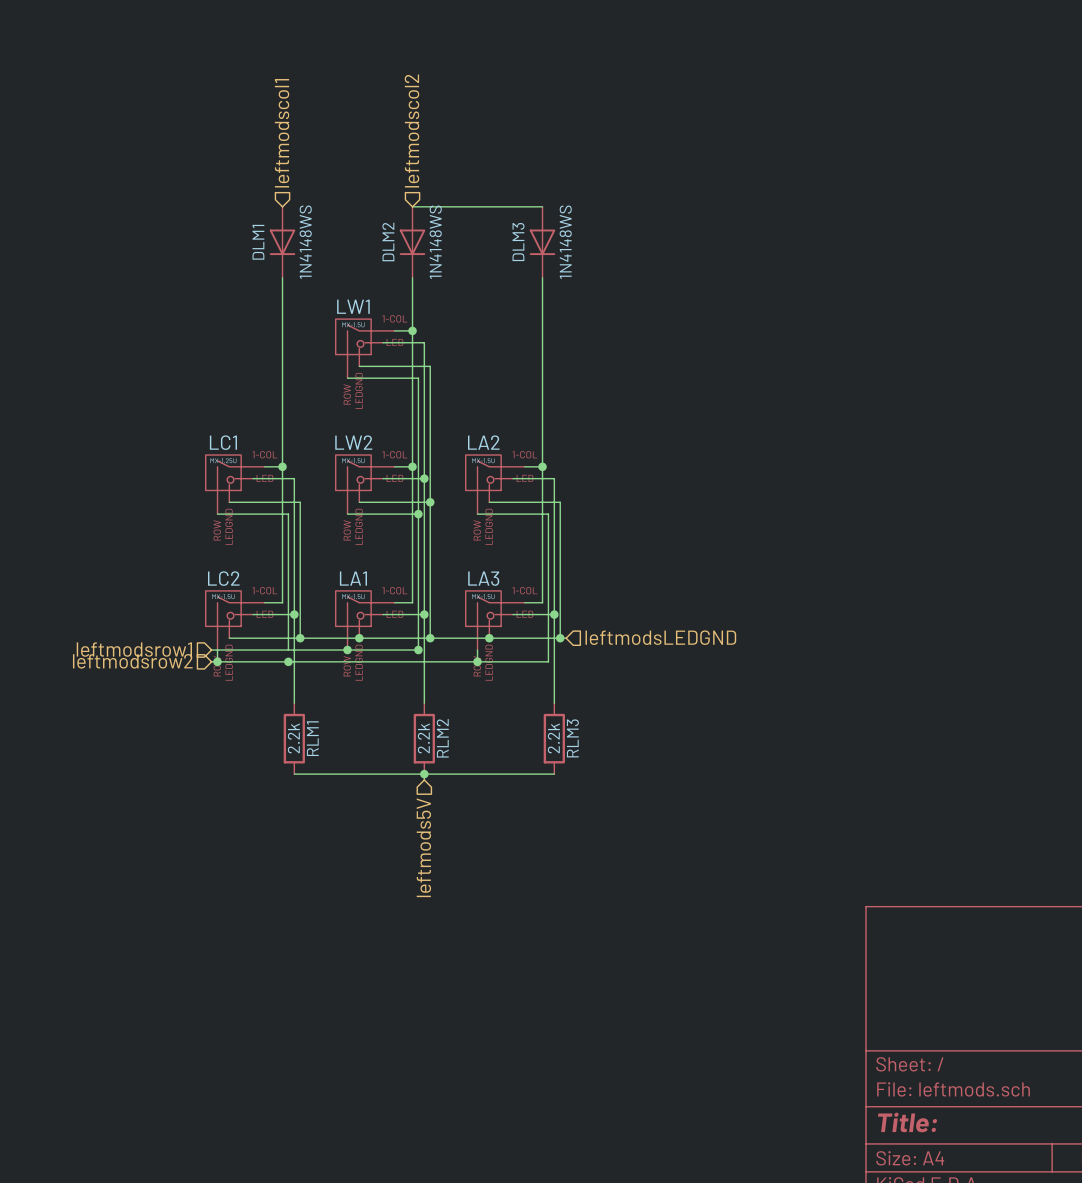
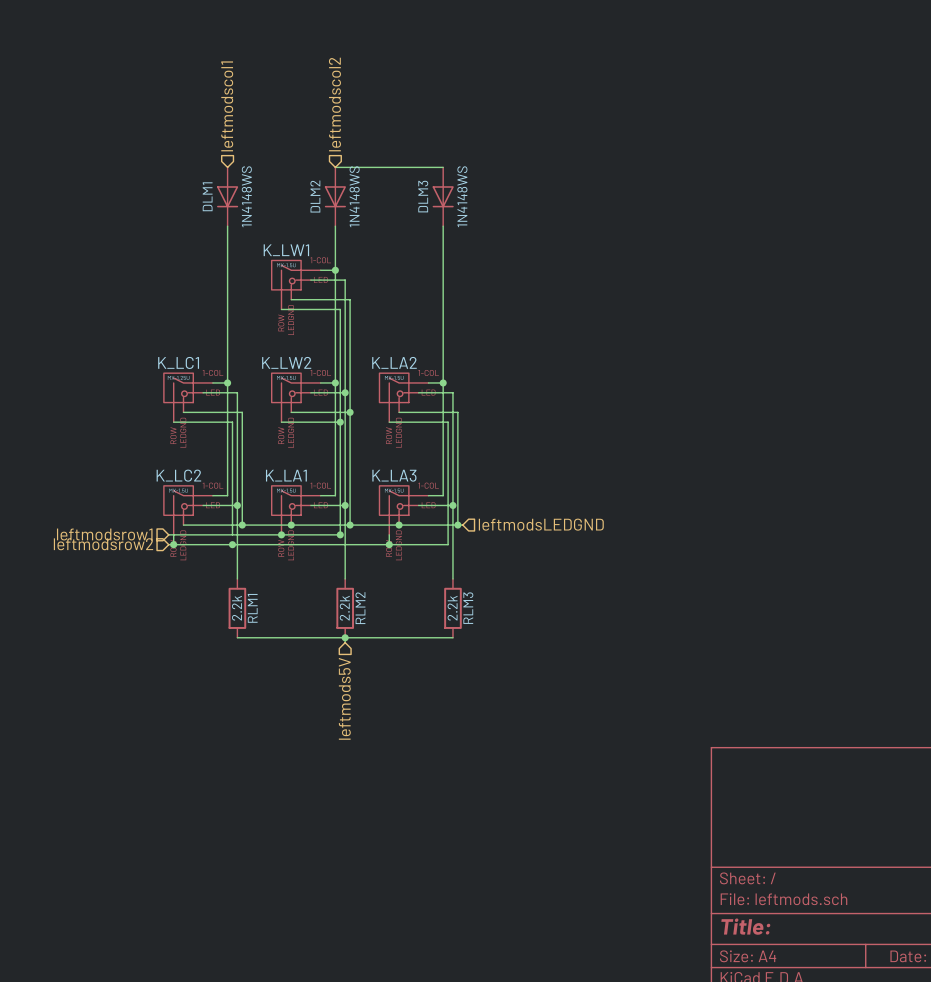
LW1 name: LW1 (353, 306) -> K_LW1 (286, 250)
LC1 name: LC1 (223, 442) -> K_LC1 (178, 362)
LW2 name: LW2 (353, 442) -> K_LW2 (286, 362)
LA2 name: LA2 (483, 442) -> K_LA2 (394, 362)
LC2 name: LC2 (223, 578) -> K_LC2 (178, 475)
LA1 name: LA1 (353, 578) -> K_LA1 (286, 475)
LA3 name: LA3 (483, 578) -> K_LA3 (394, 475)

